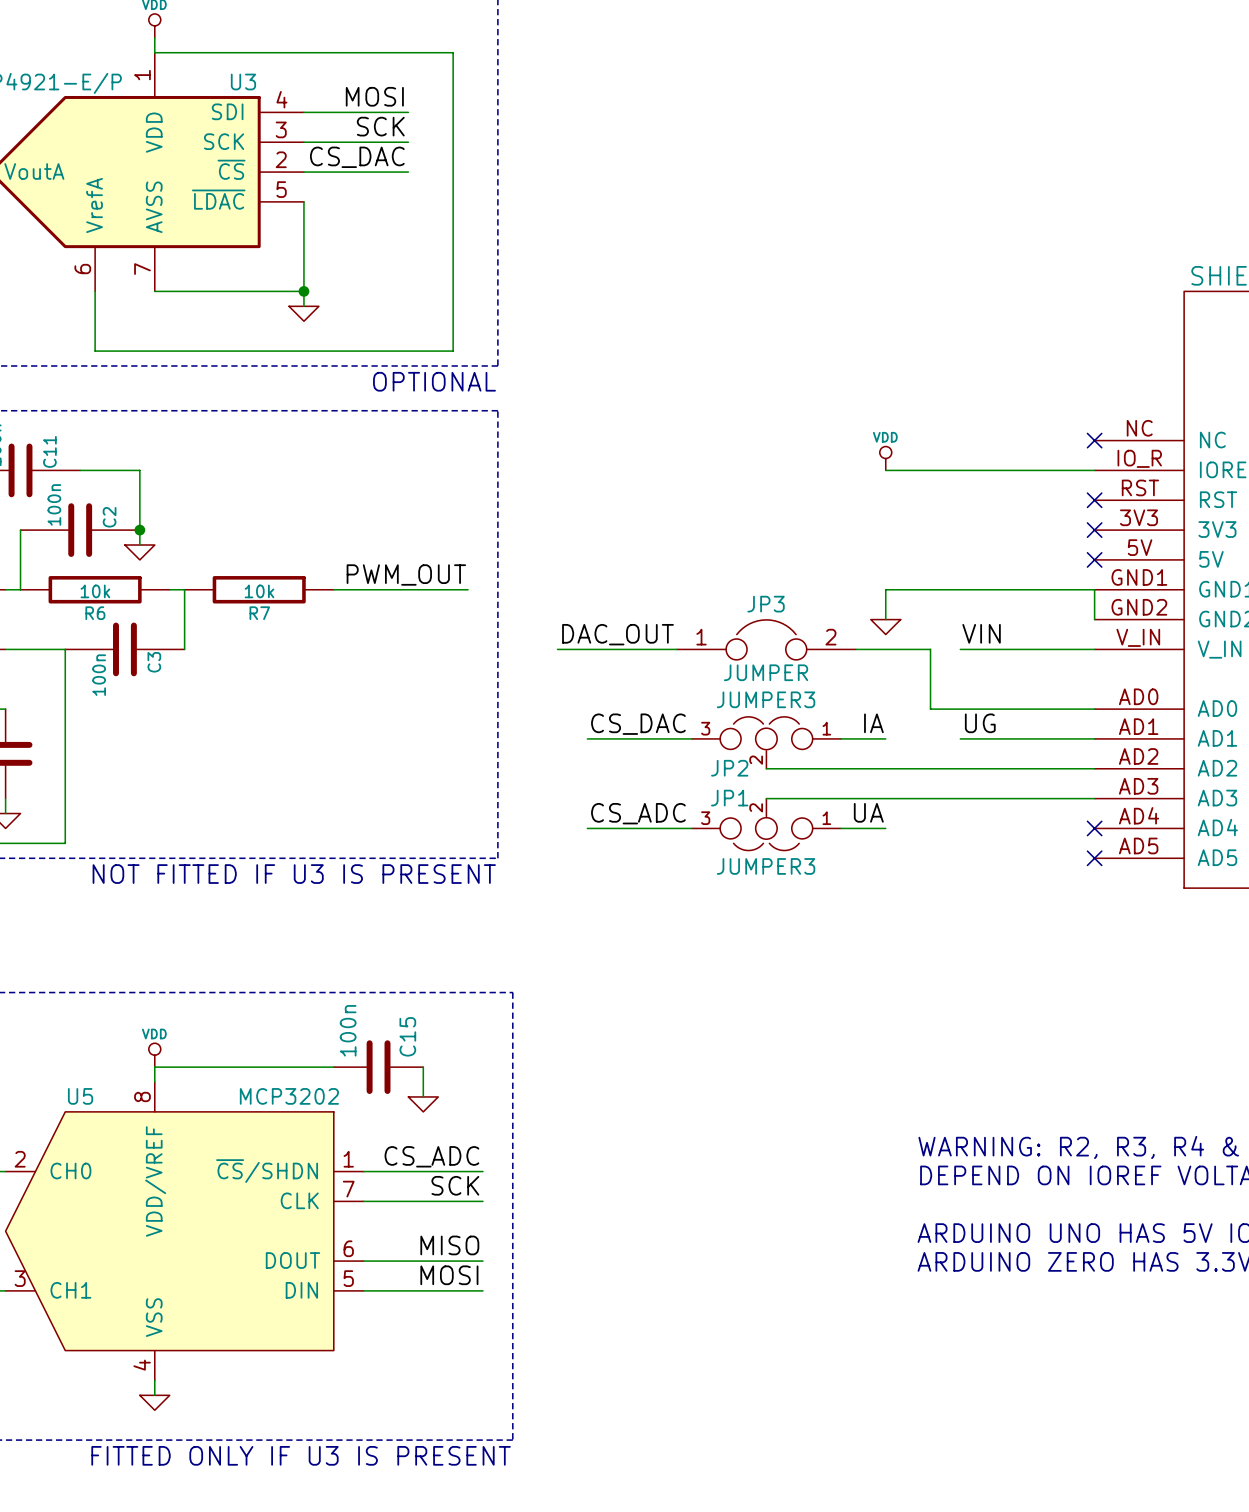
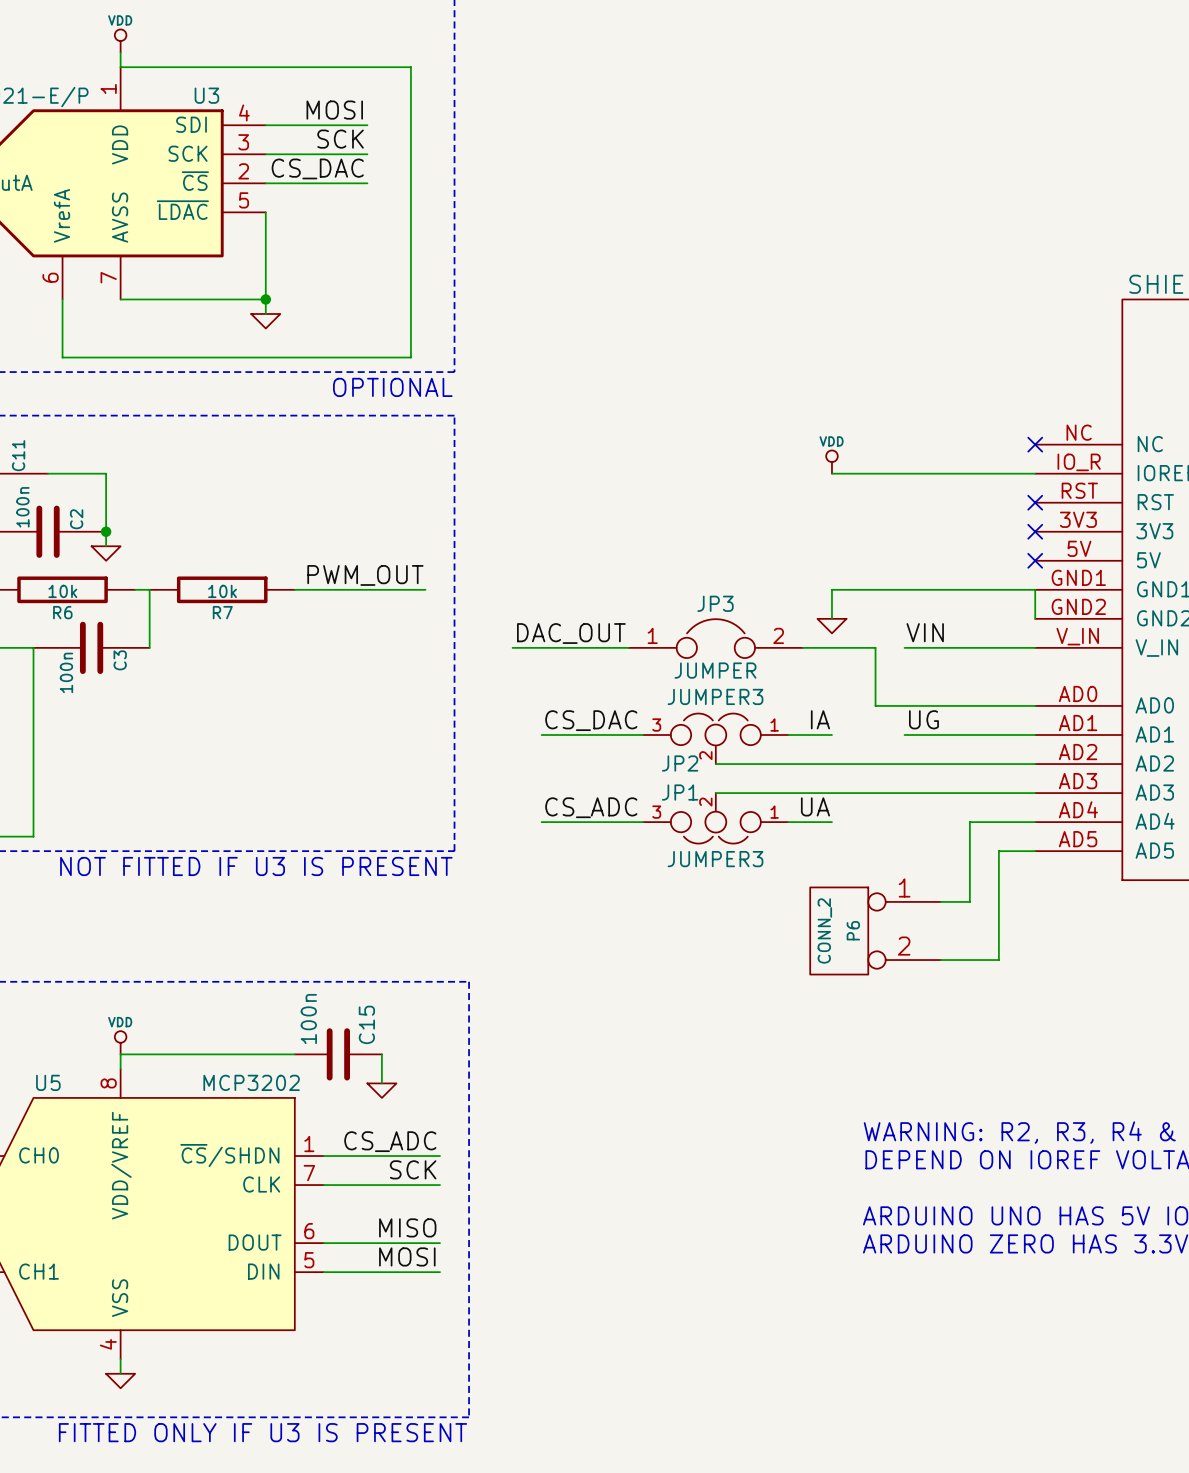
wire: none -> (1035, 822) (969, 822) (969, 901) (940, 901)
no-connect mark: (1094, 828) -> none
wire: none -> (1035, 851) (998, 851) (998, 960) (940, 960)
no-connect mark: (1094, 858) -> none
P6: none -> CONN_2 (875, 930)

